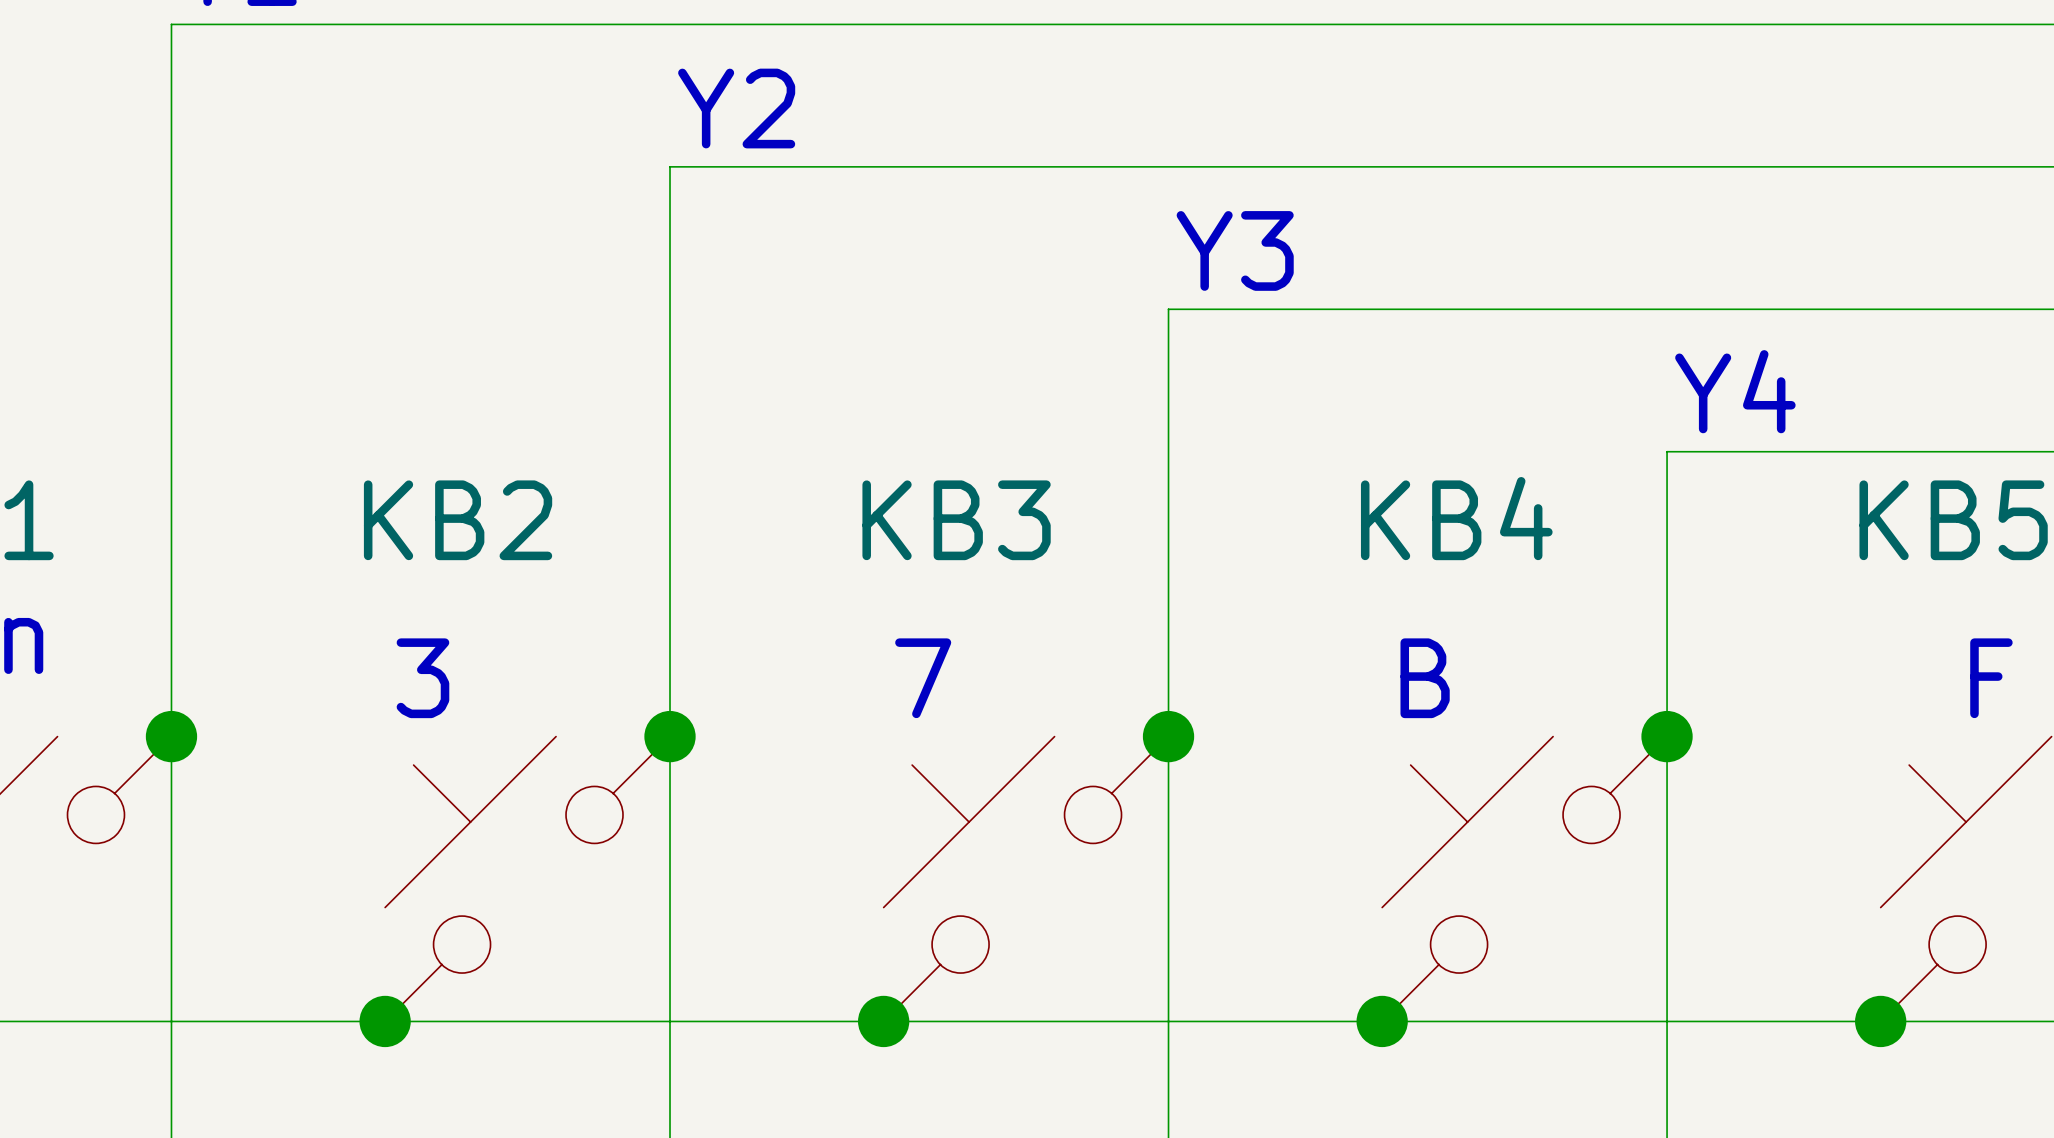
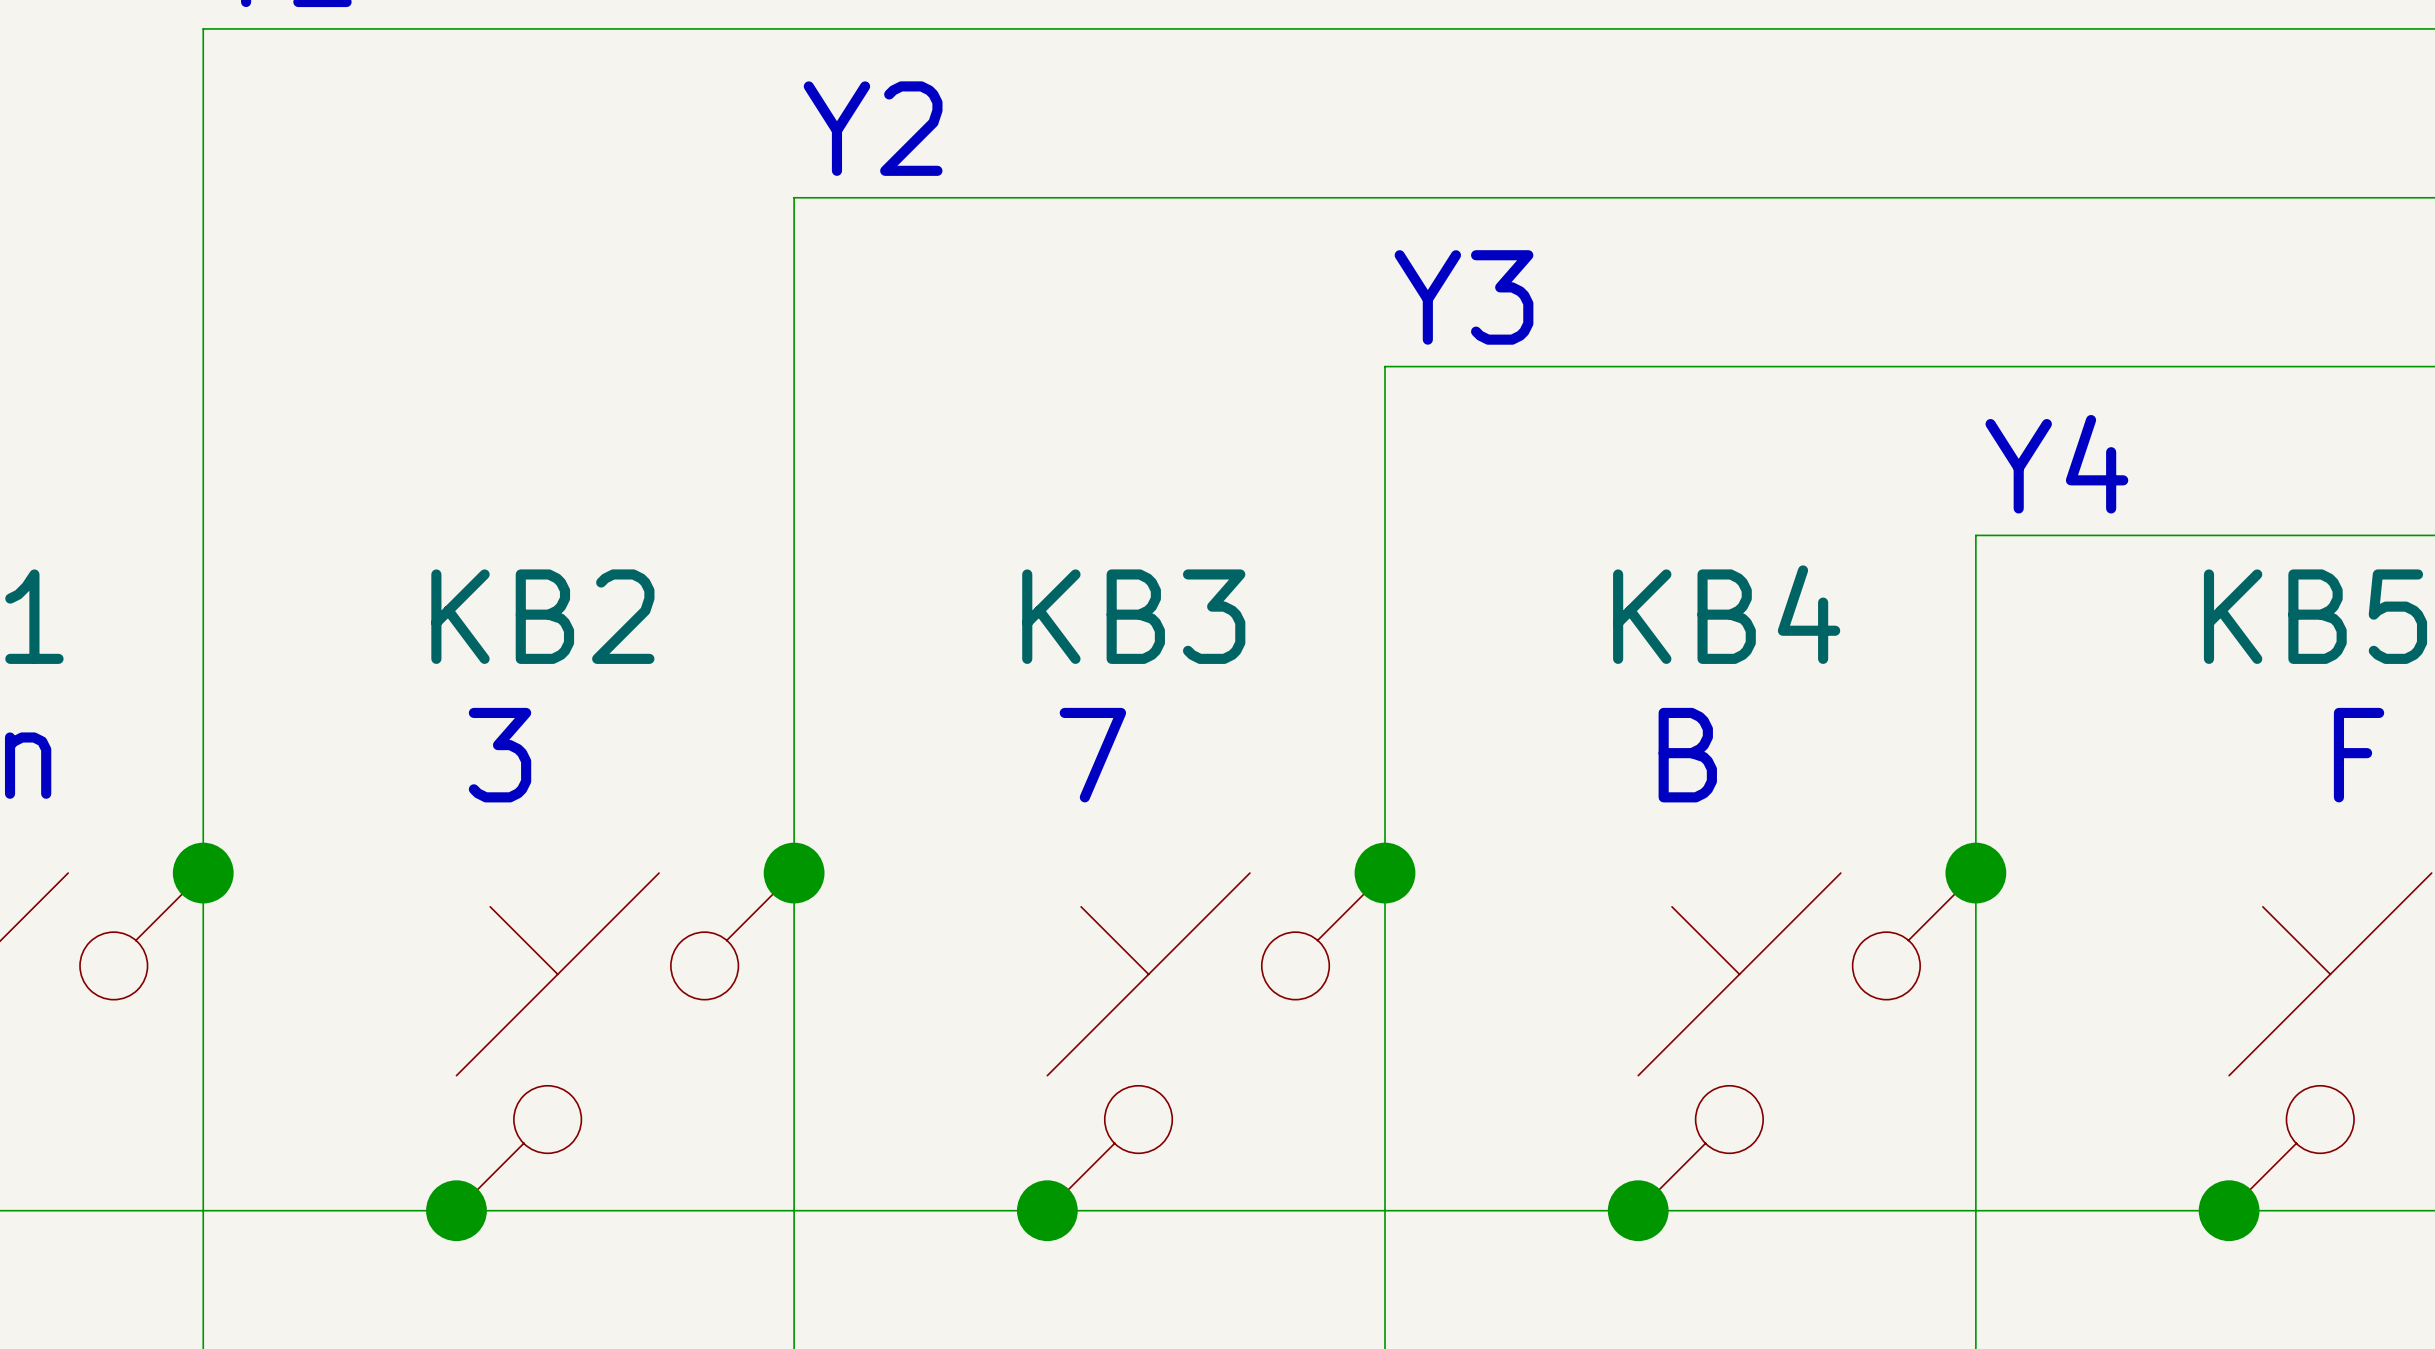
text position: 3 (422, 678) -> 3 (500, 755)
text position: 7 (923, 678) -> 7 (1092, 755)
text position: B (1425, 678) -> B (1687, 755)
text position: F (1991, 678) -> F (2359, 755)

